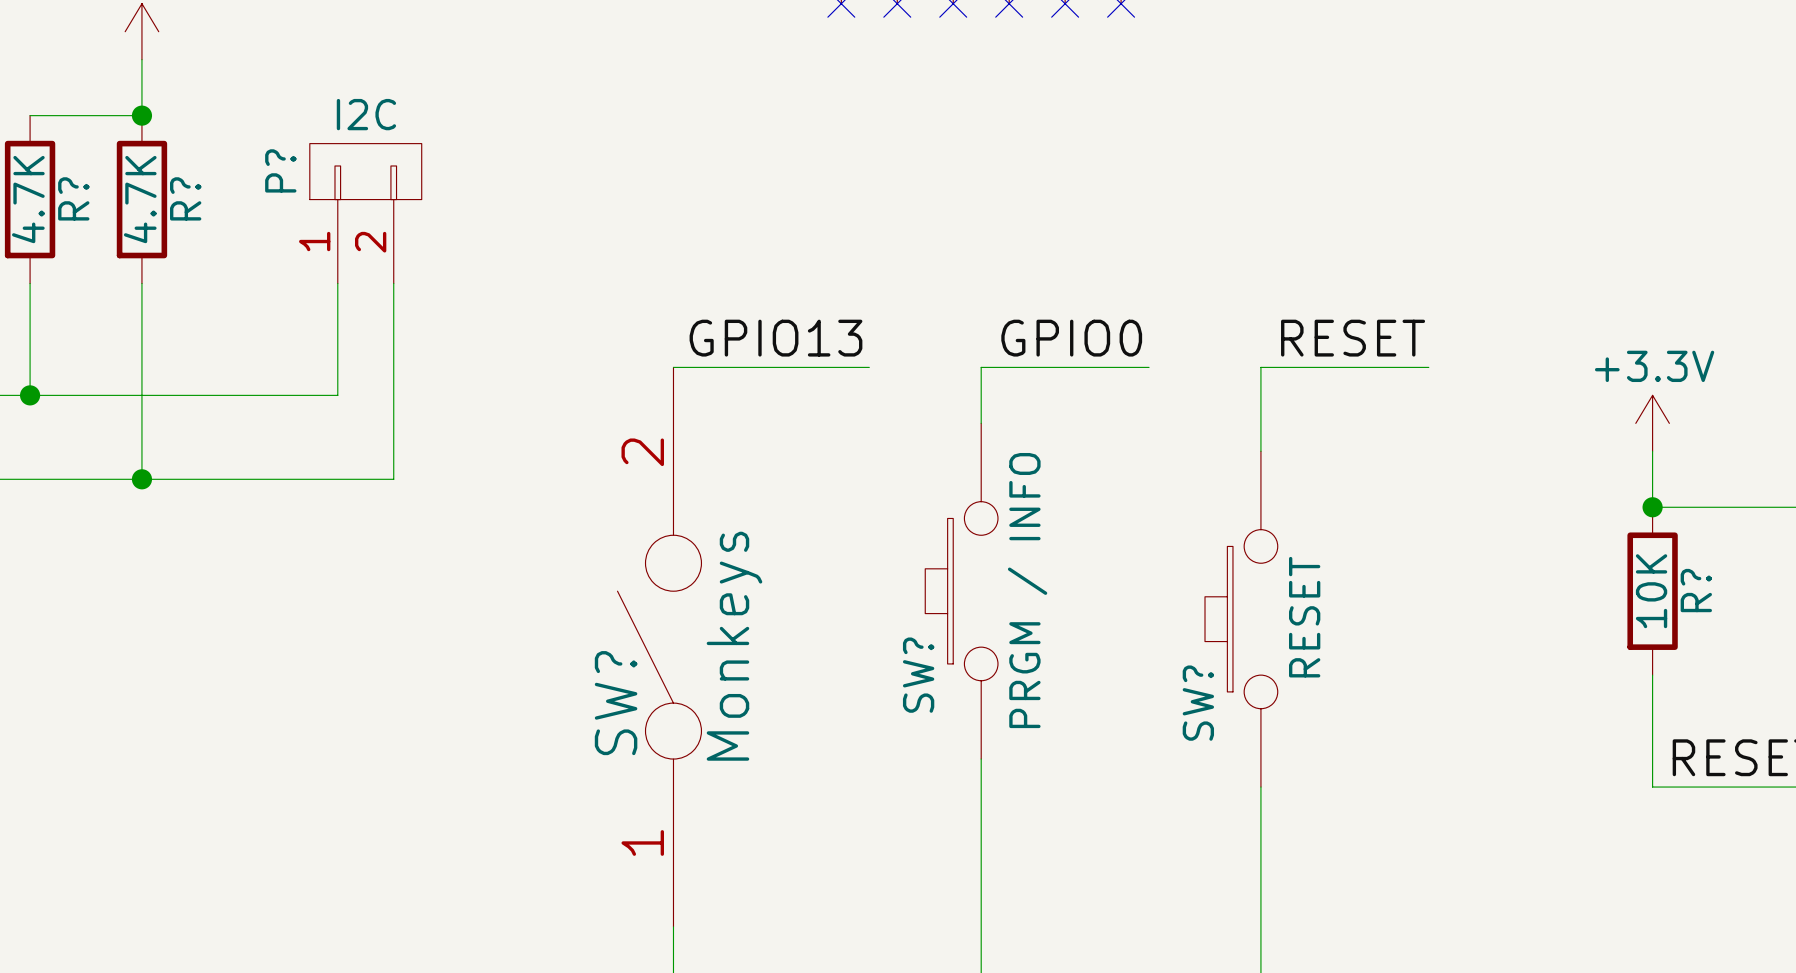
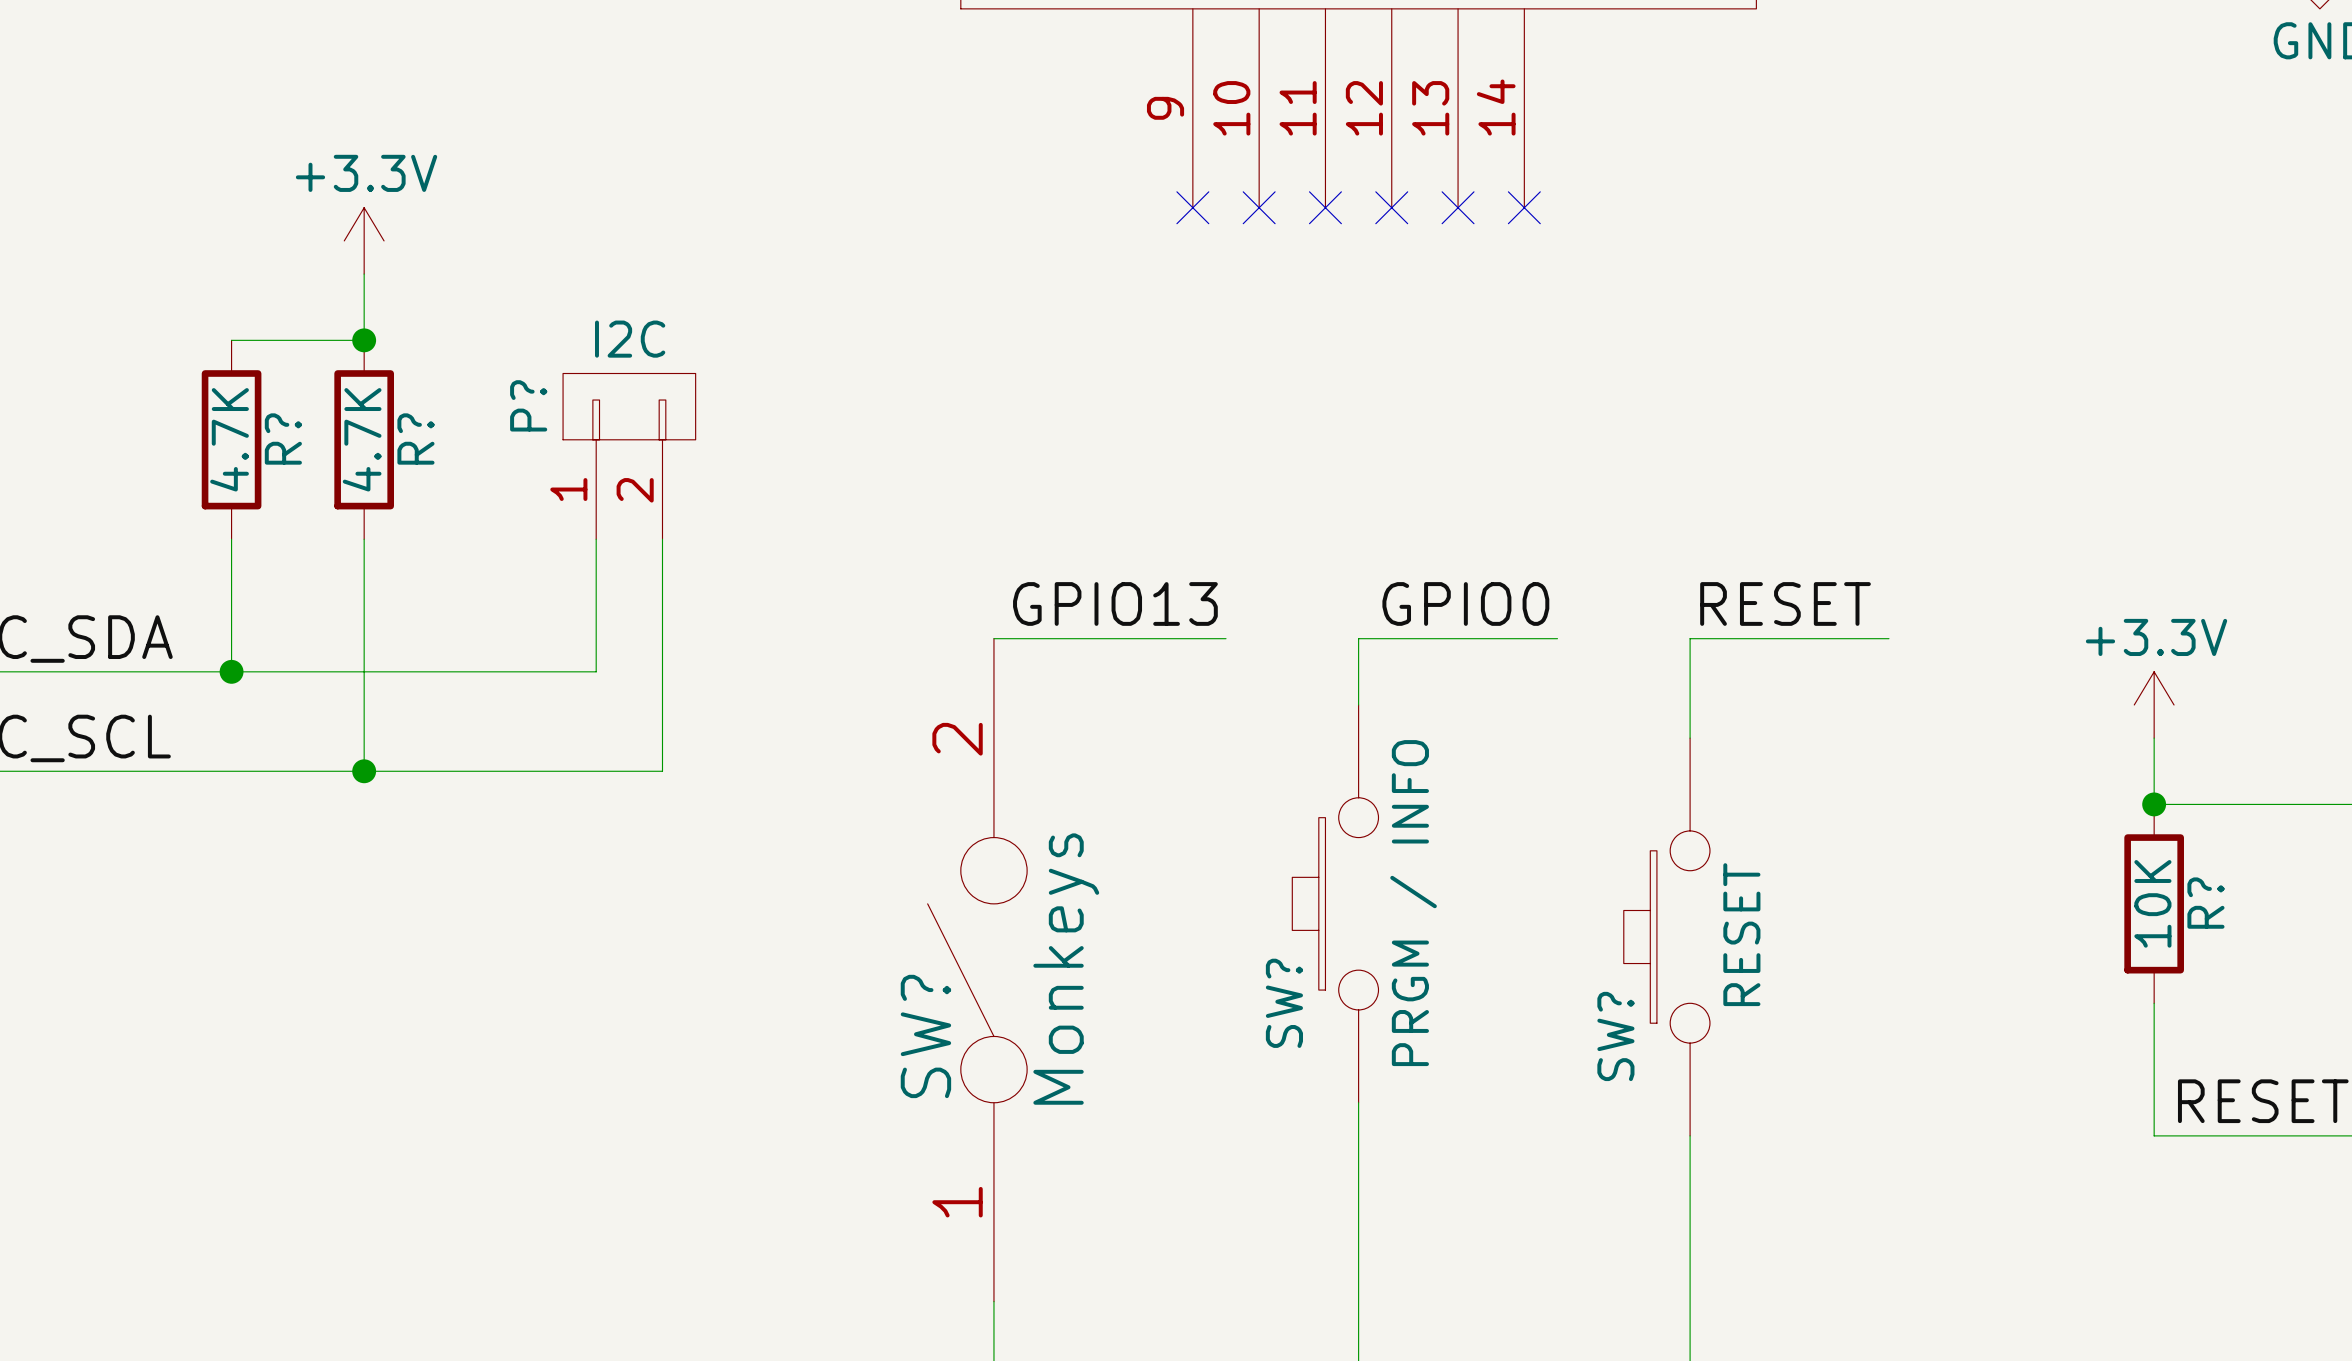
label position: RESET (1353, 338) -> RESET (1785, 603)

